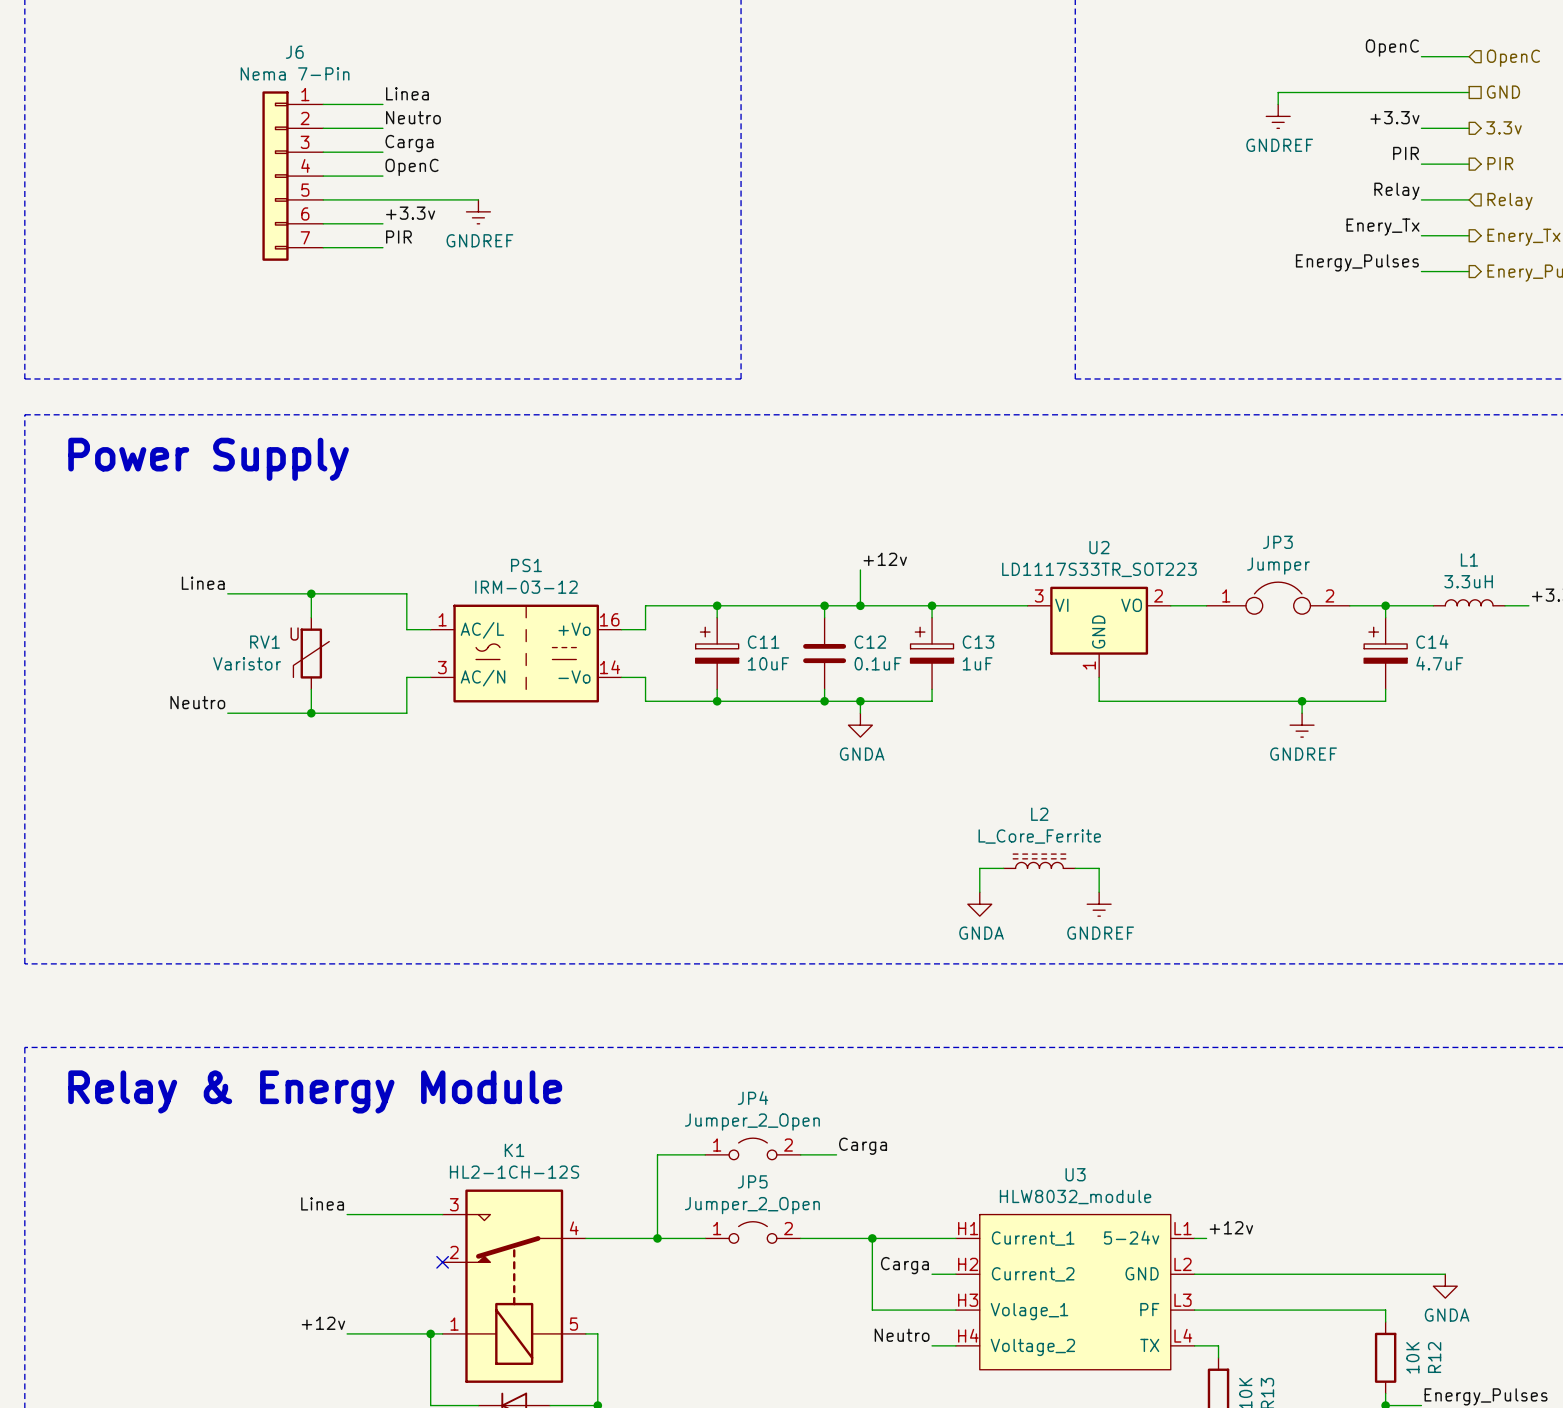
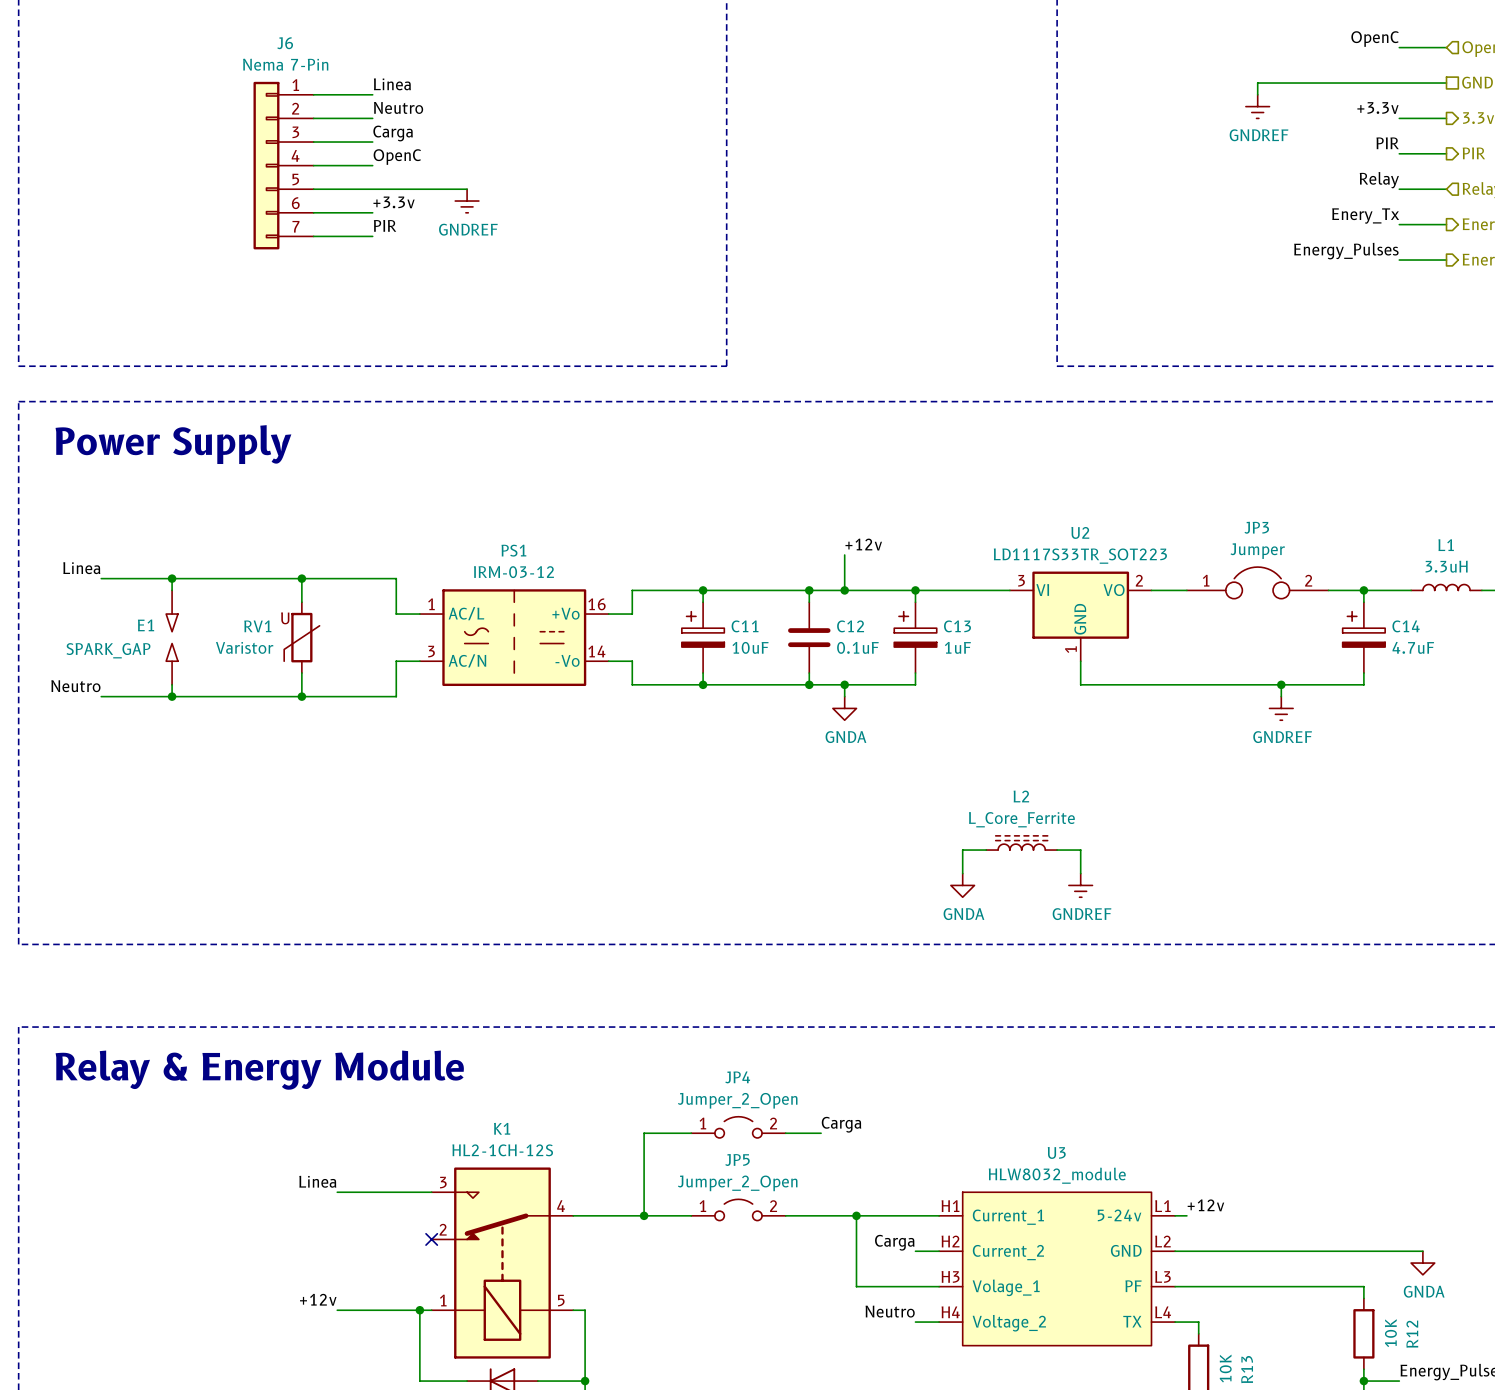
label position: Linea (203, 583) -> Linea (81, 568)
wire: none -> (101, 578) (219, 578)
wire: none -> (172, 578) (172, 590)
junction: none -> (172, 578)
E1: none -> SPARK_GAP (172, 637)
wire: none -> (172, 684) (172, 696)
label position: Neutro (197, 702) -> Neutro (75, 686)
wire: none -> (101, 696) (219, 696)
junction: none -> (172, 696)

